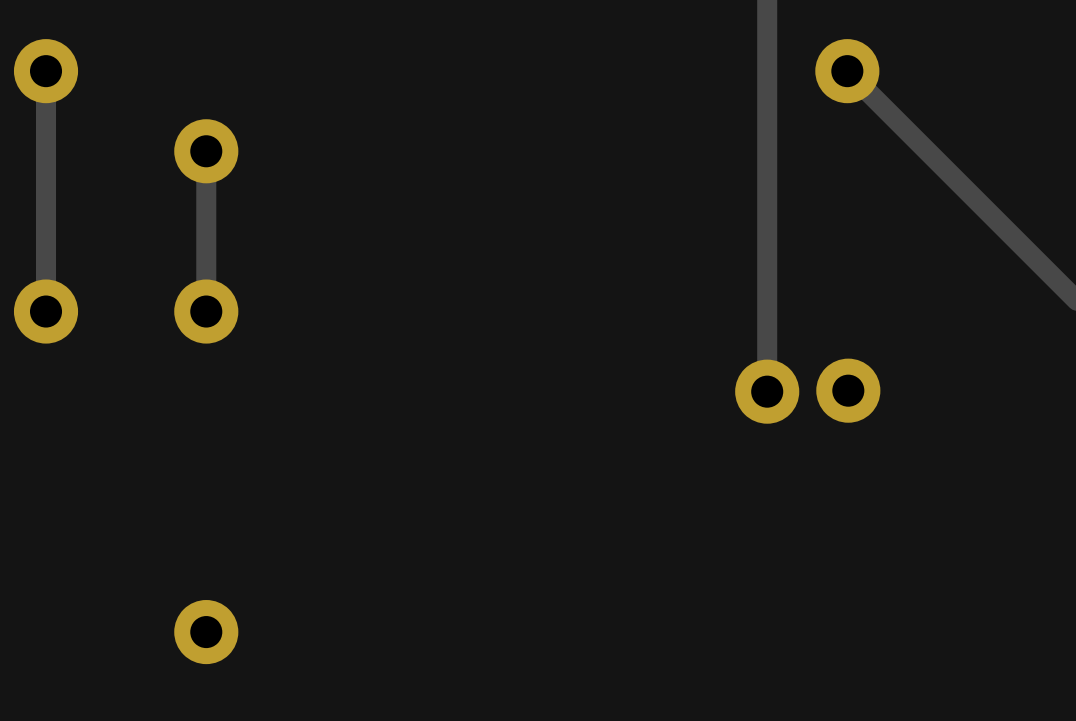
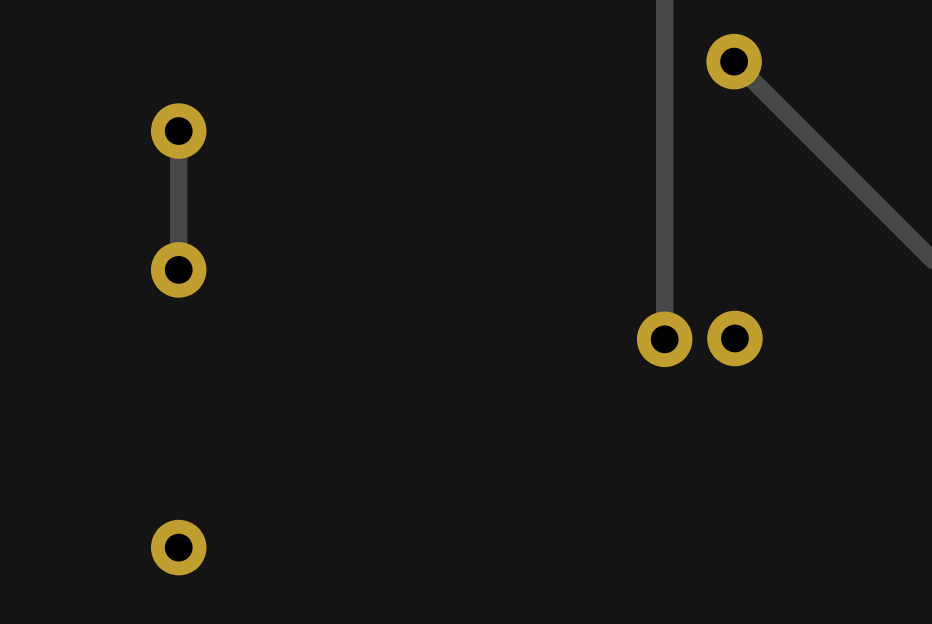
track: (46, 71) (46, 311) -> none
via: (46, 71) -> none
via: (46, 311) -> none

